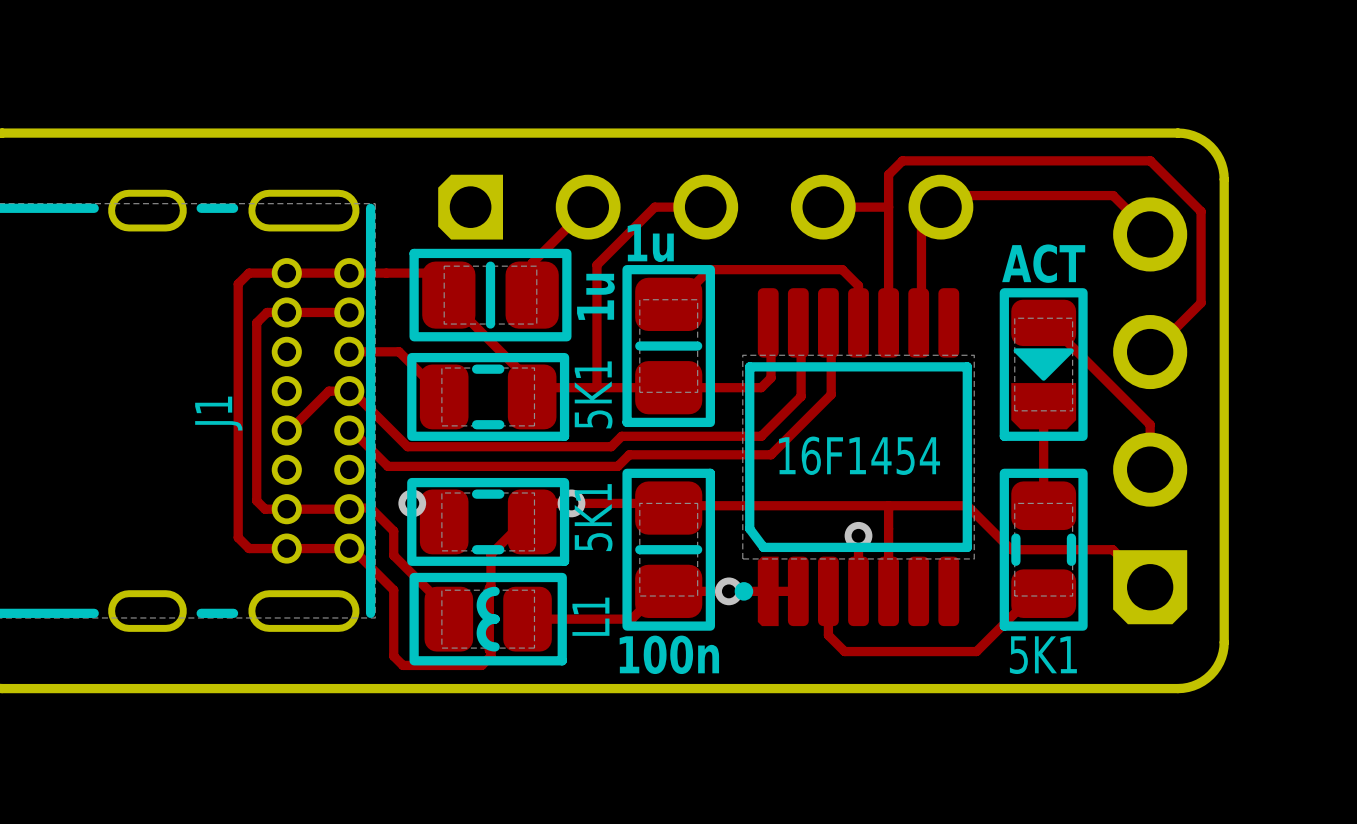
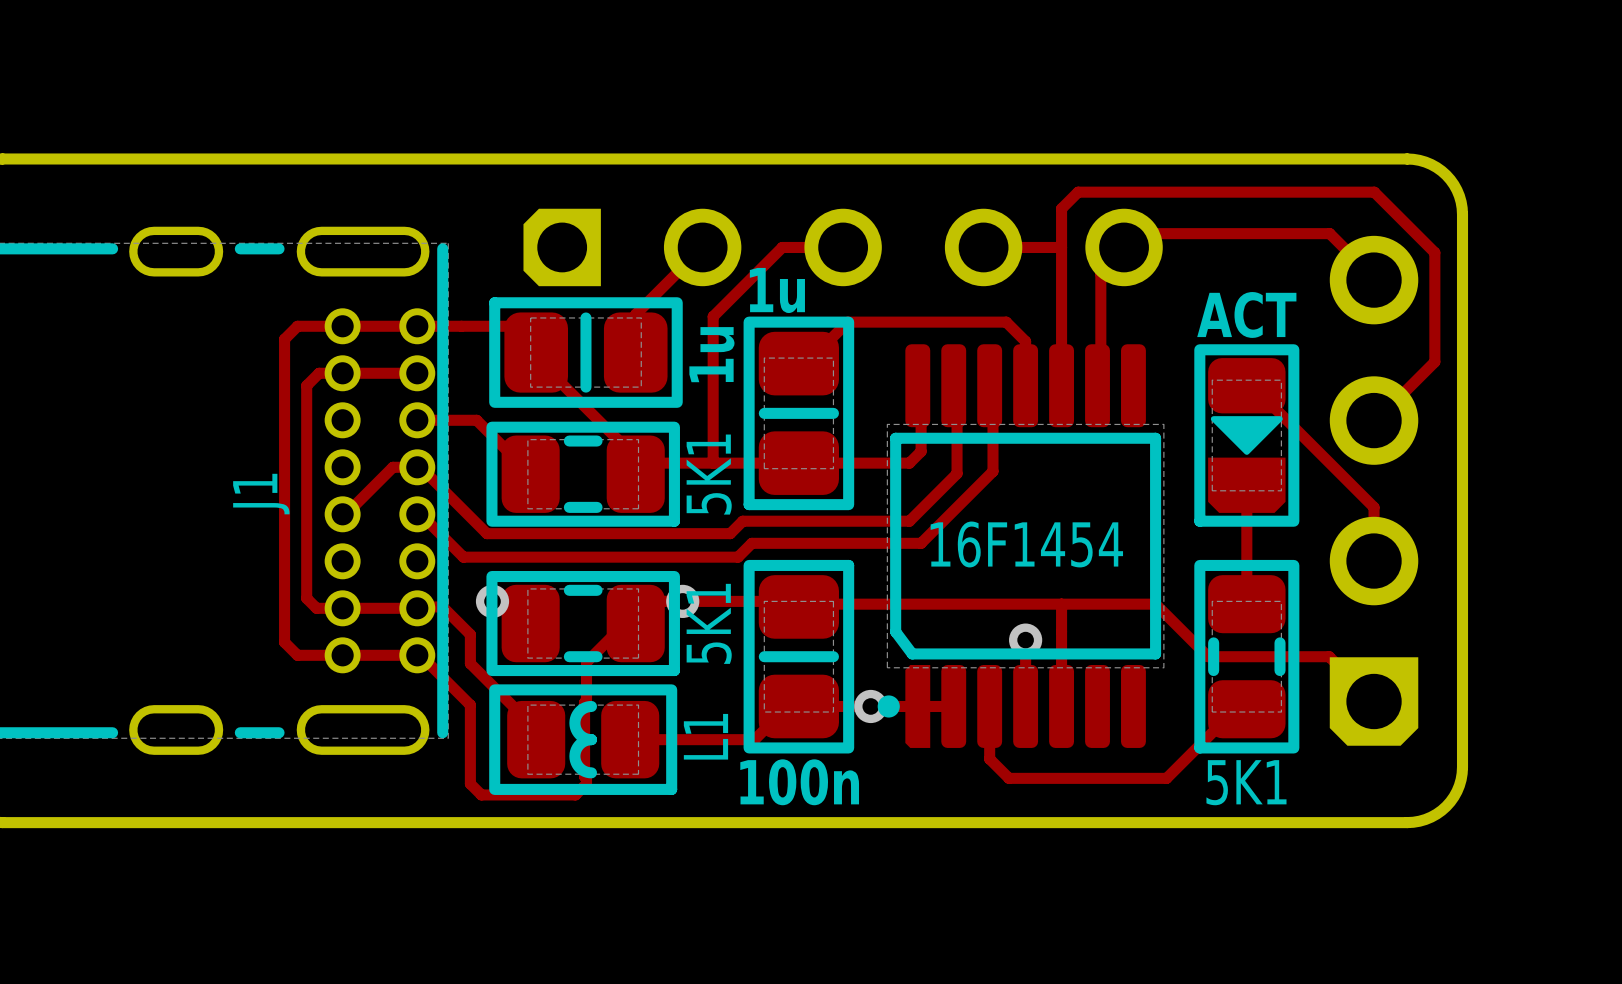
part value position: 5K1 (593, 394) -> 5K1 (709, 623)
part value position: 5K1 (593, 517) -> 5K1 (709, 474)

